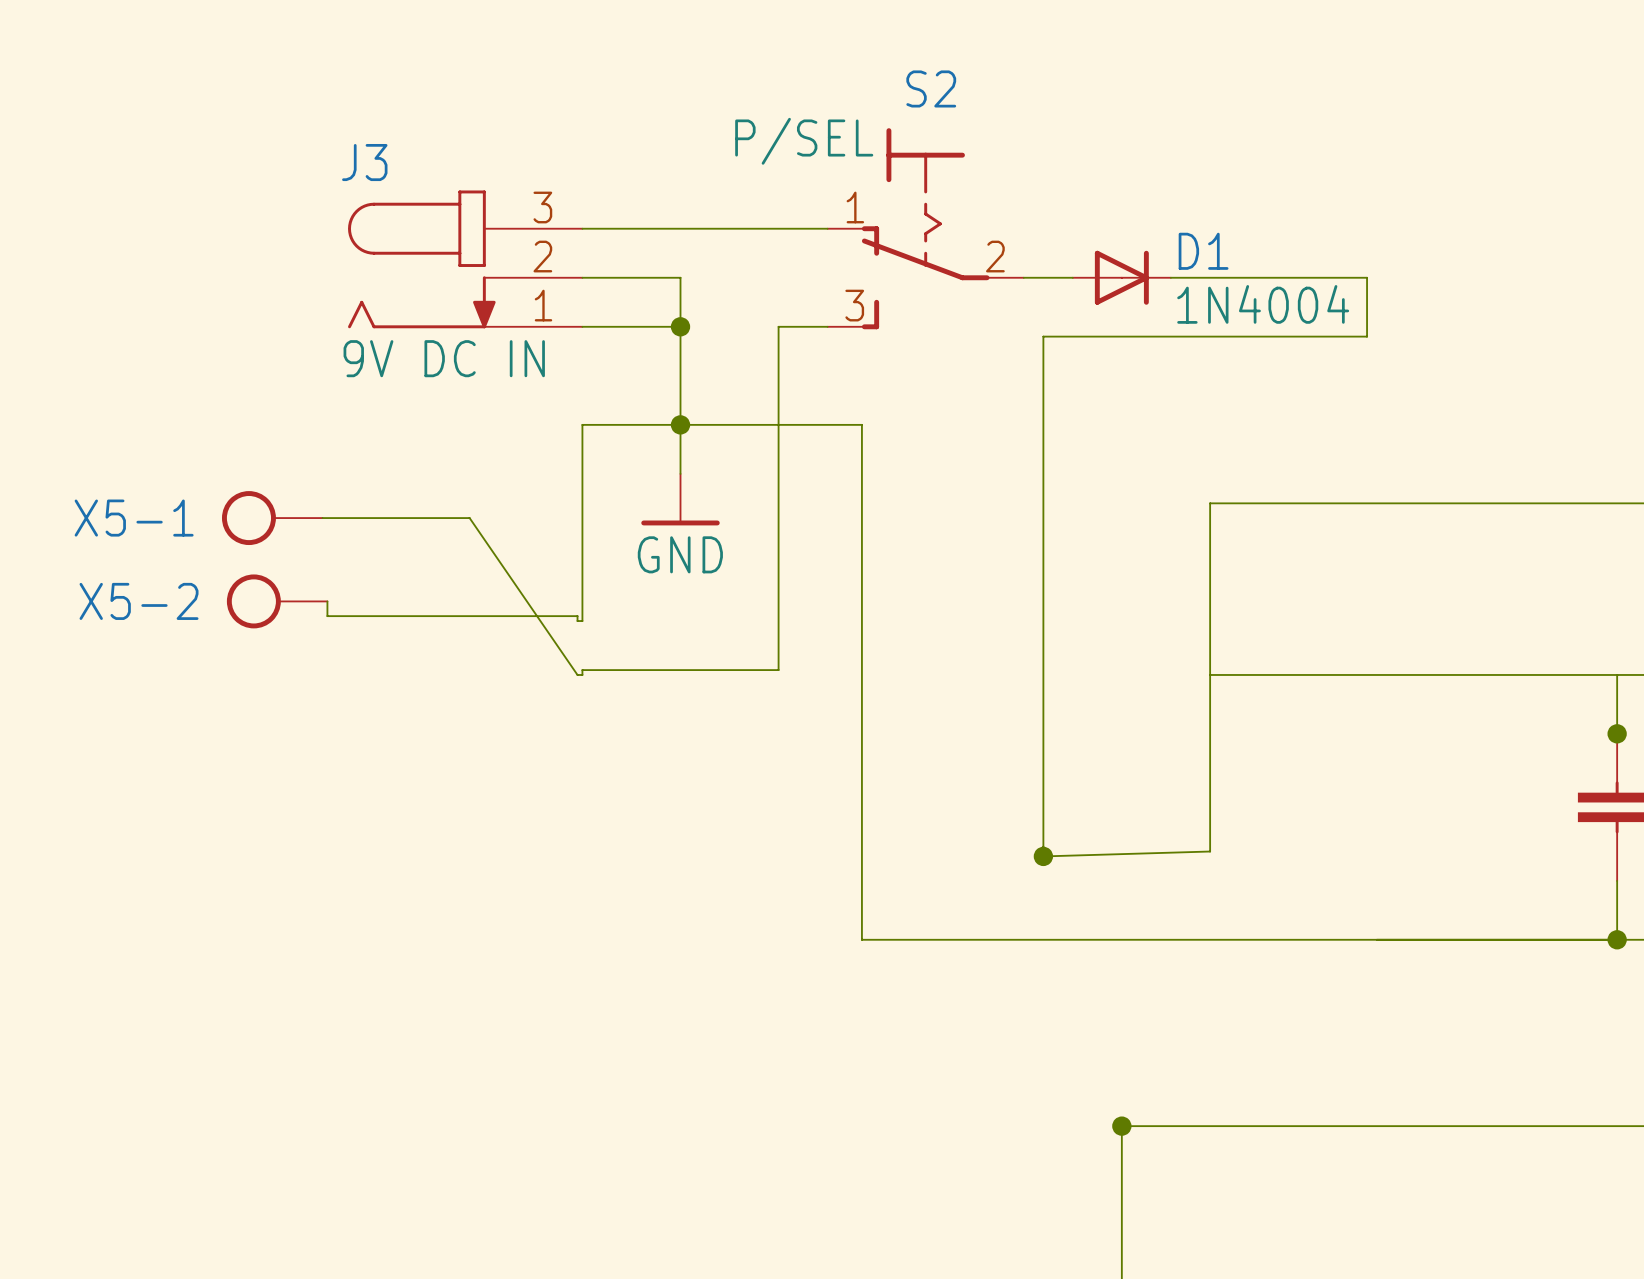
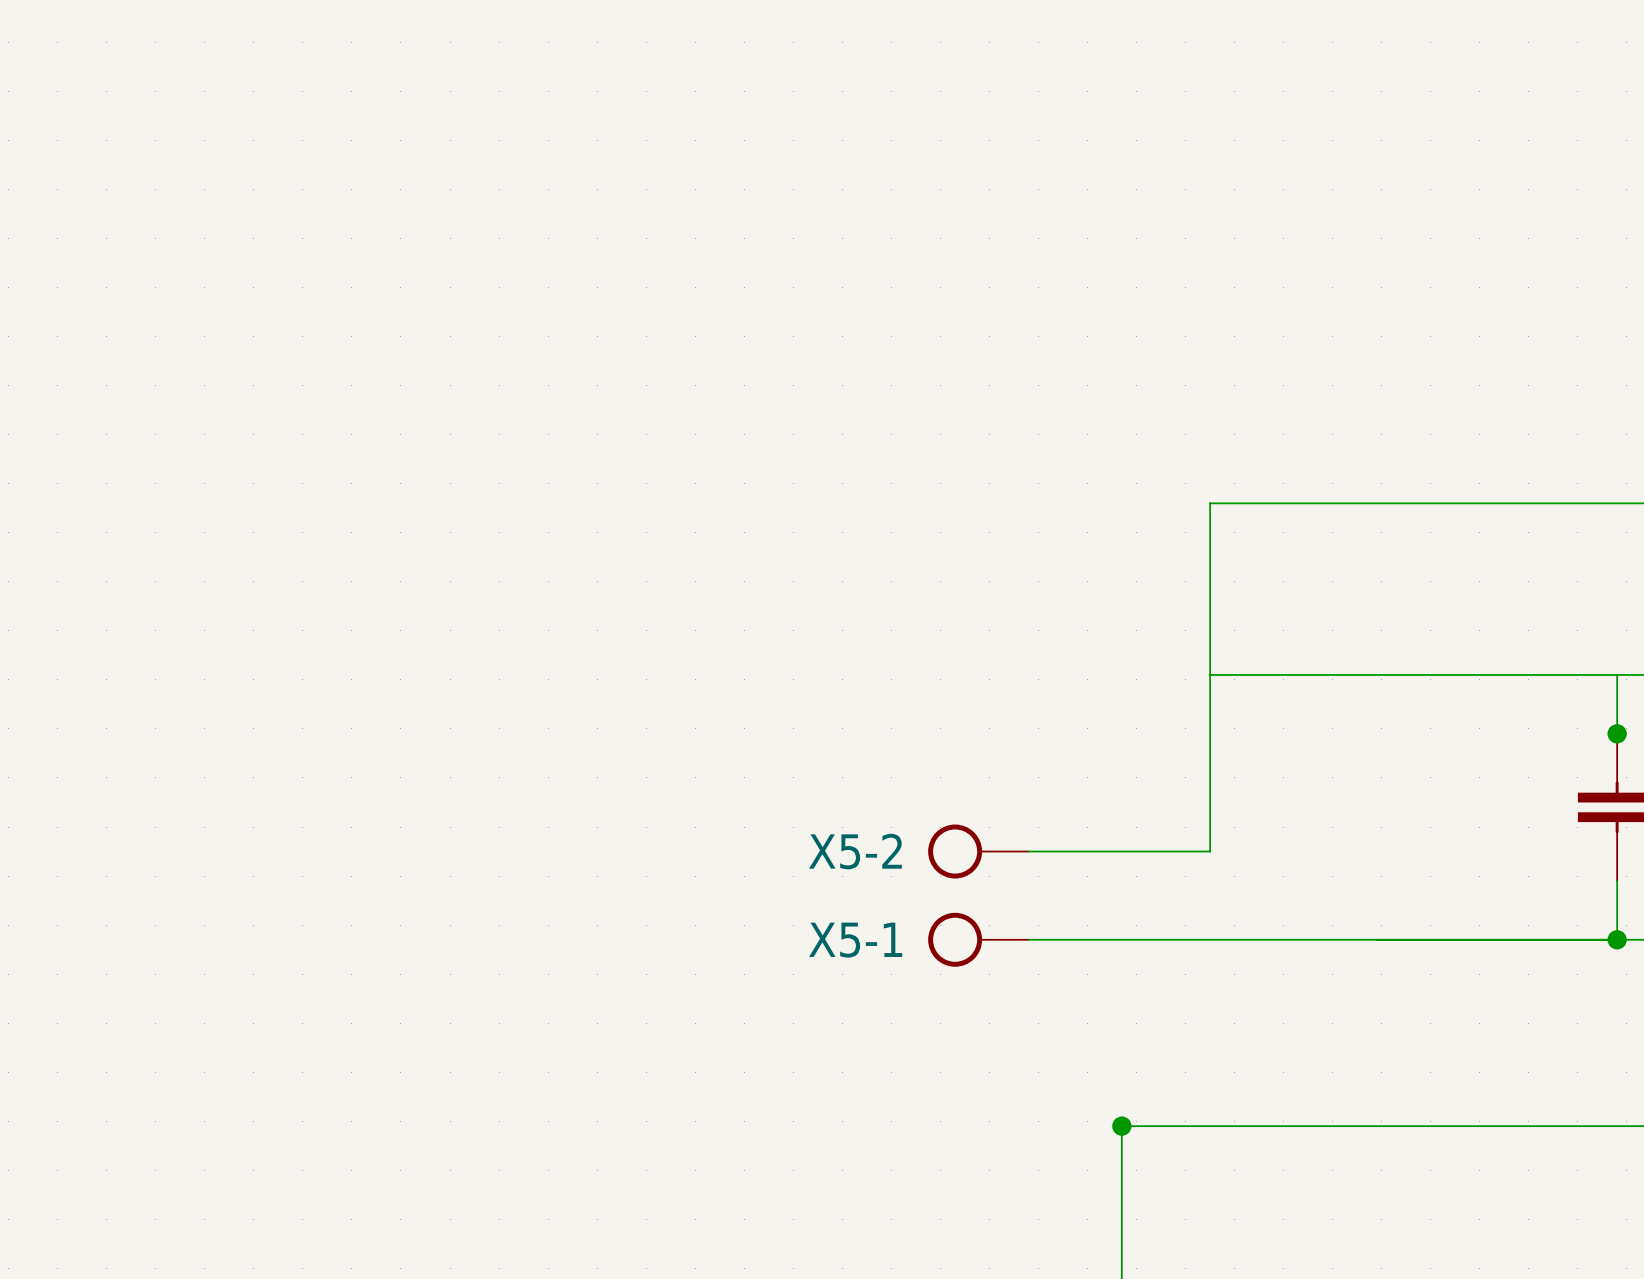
wire: (582, 228) (827, 228) -> none
S2: P/SEL (925, 228) -> none
J3: 9V DC IN (465, 259) -> none
wire: (582, 277) (680, 277) (680, 473) -> none
wire: (1023, 277) (1072, 277) -> none
D1: 1N4004 (1121, 277) -> none
wire: (1170, 277) (1367, 277) (1367, 336) (1043, 336) (1043, 856) (1210, 851) -> (1028, 851) (1210, 851)
wire: (582, 326) (680, 326) -> none
junction: (680, 326) -> none
wire: (827, 326) (778, 326) (778, 670) (582, 670) (582, 674) (577, 674) (469, 518) (322, 518) -> none
wire: (680, 424) (582, 424) (582, 621) (577, 621) (577, 616) (327, 616) (327, 601) -> none
junction: (680, 424) -> none
wire: (685, 424) (861, 424) (861, 939) (1028, 939) -> none
power symbol: GND (680, 499) -> none
X5-1 position: (272, 518) -> (978, 939)
X5-2 position: (277, 601) -> (978, 851)
junction: (1043, 856) -> none

